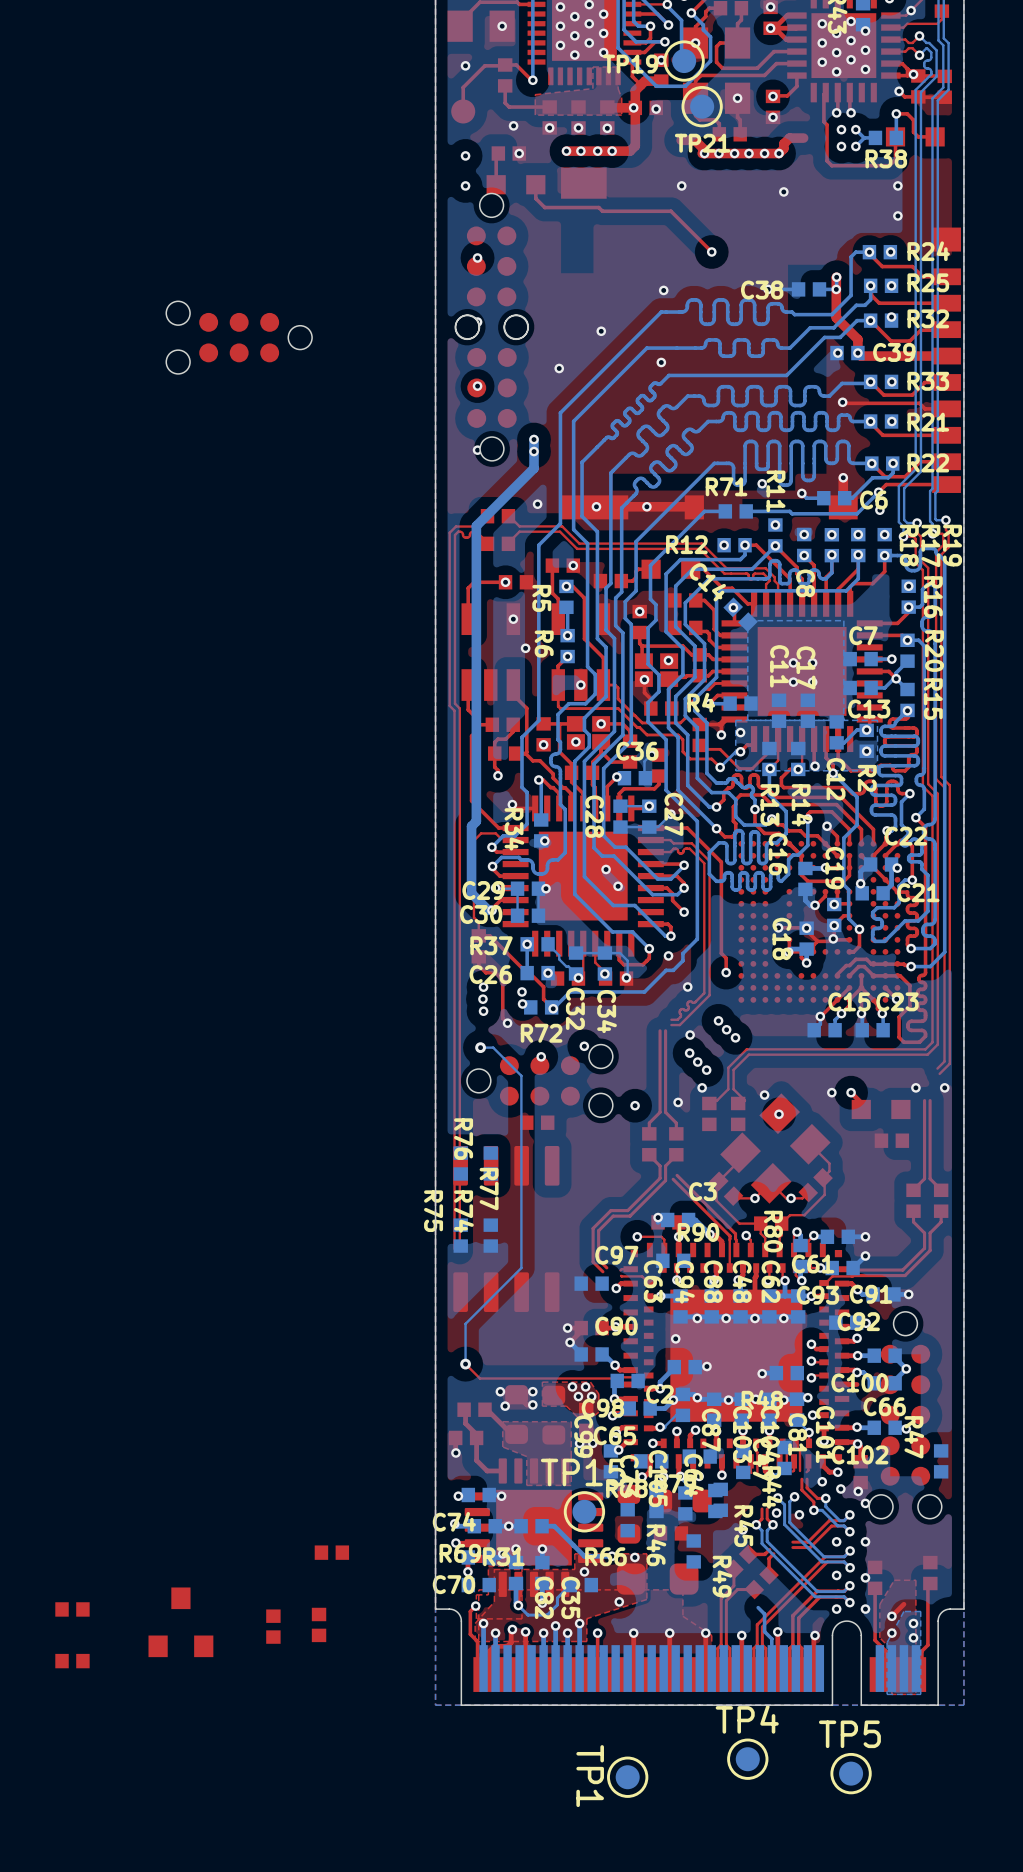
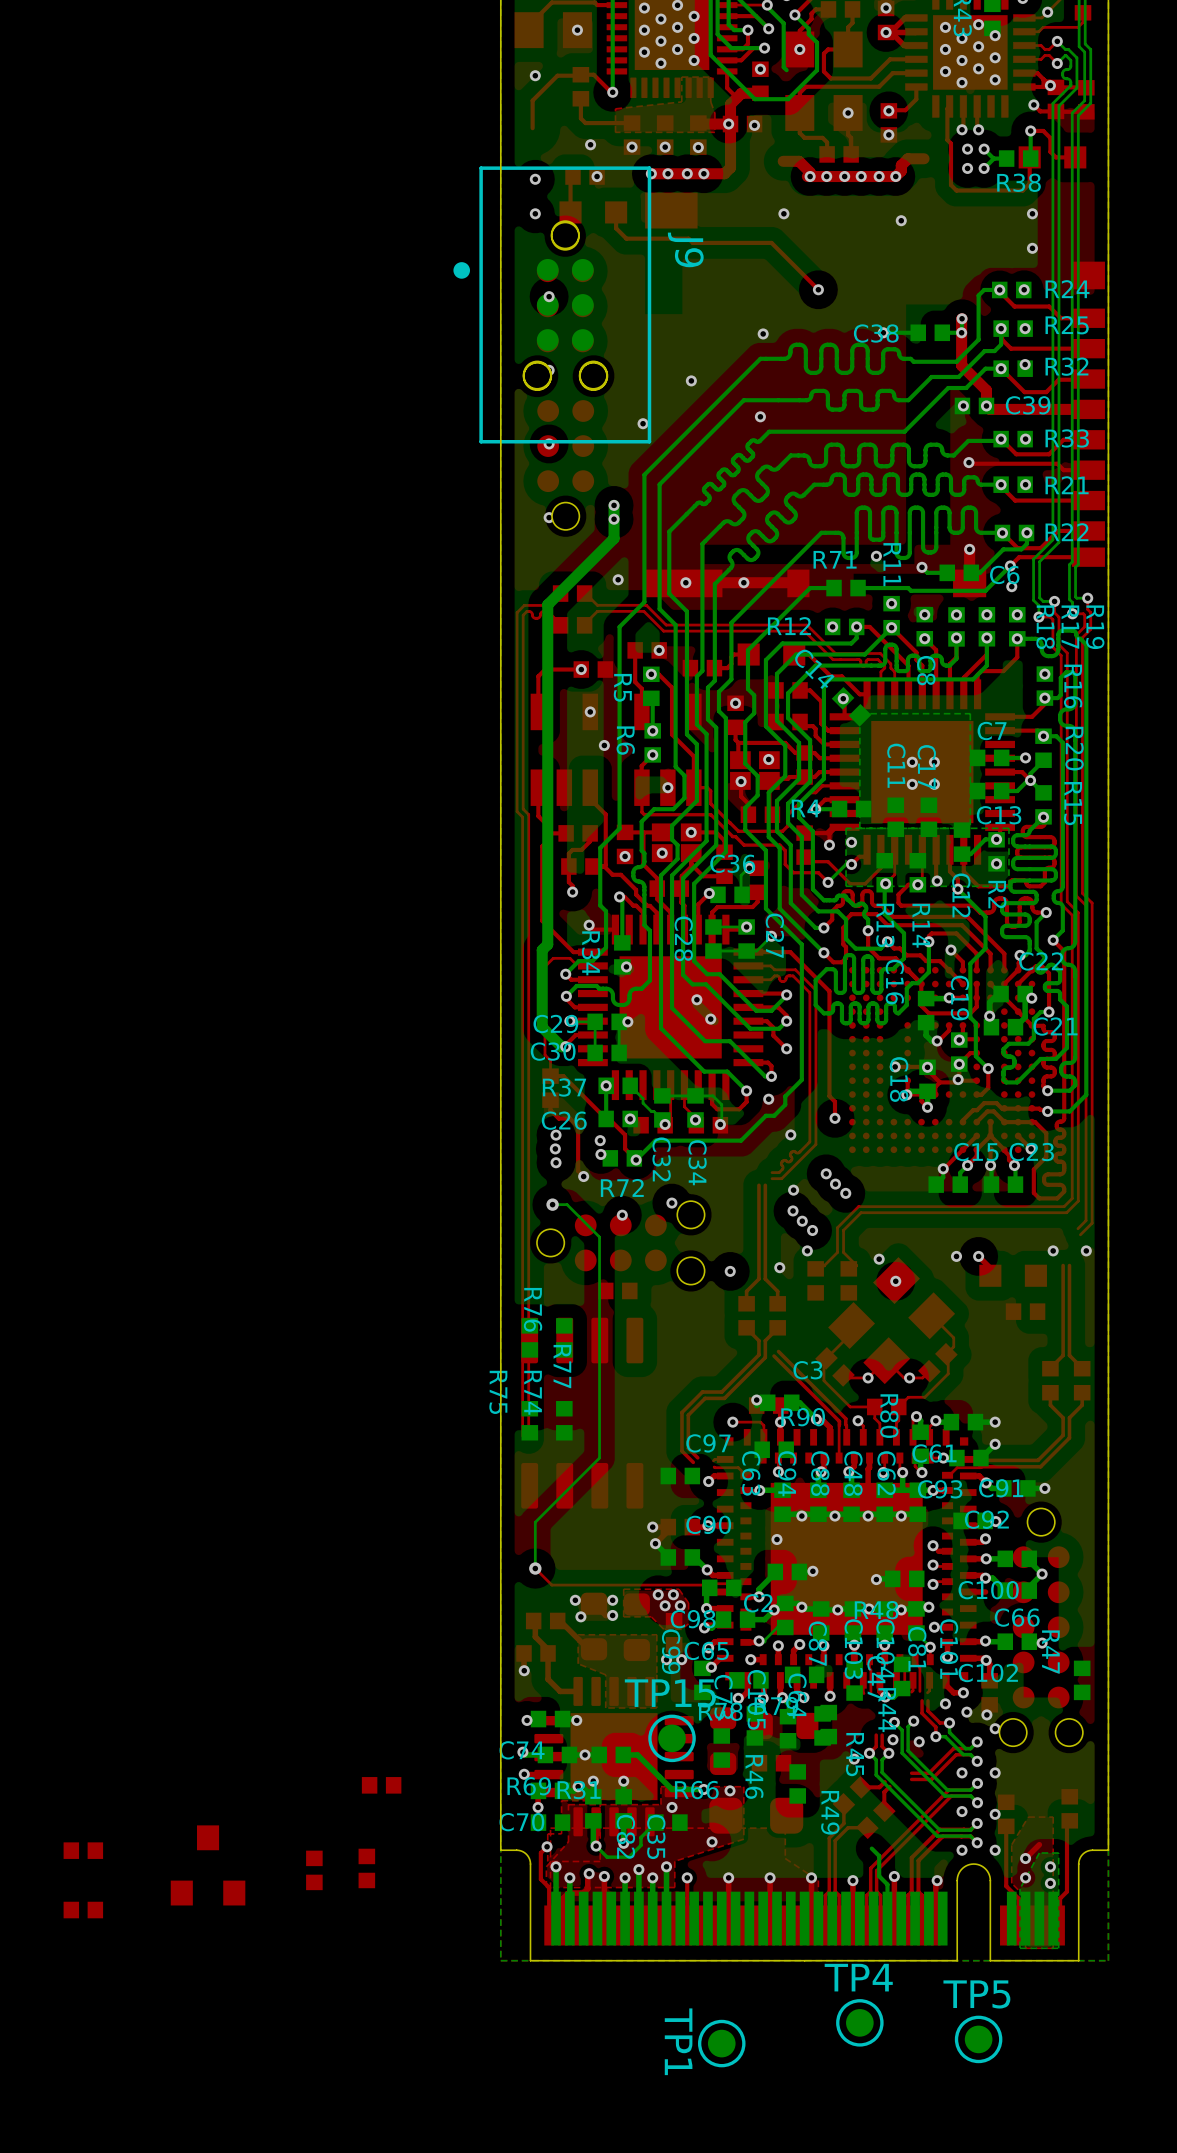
TP19: (684, 61) -> none
TP21: (702, 106) -> none
part: (463, 111) -> none
J9: none -> (552, 304)
part: (239, 337) -> none

